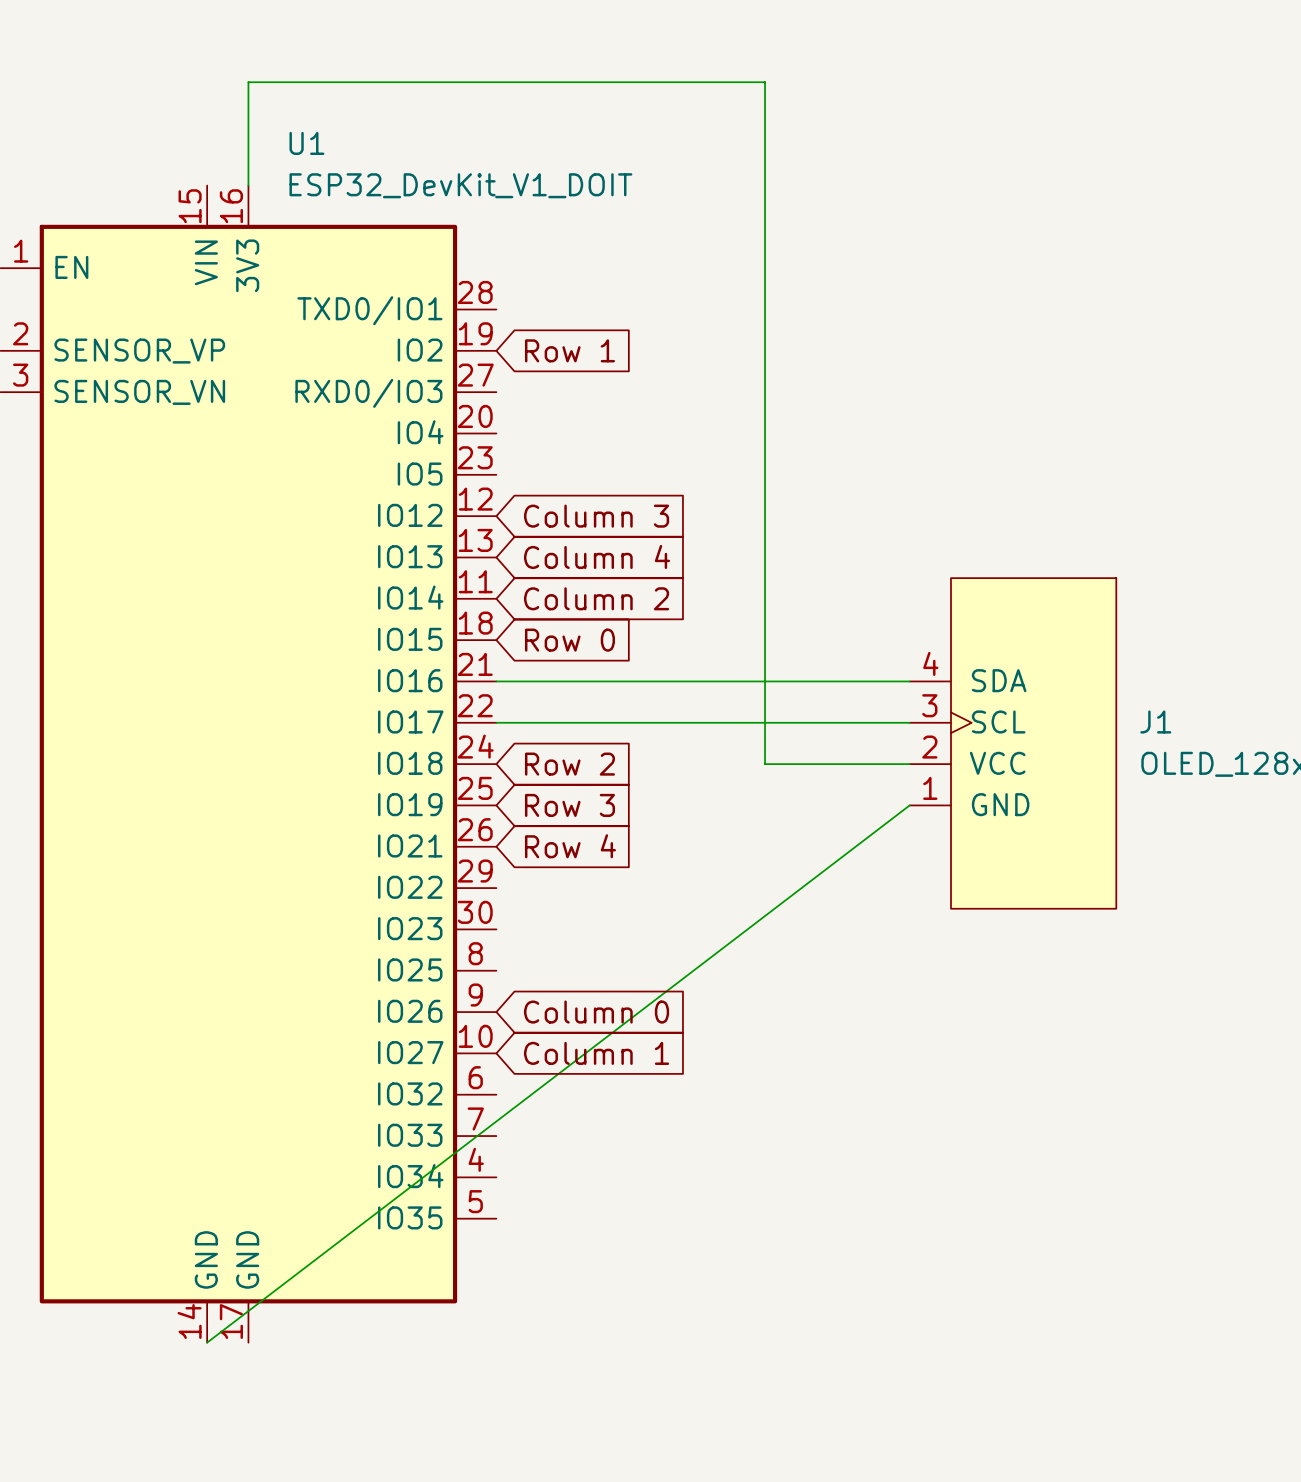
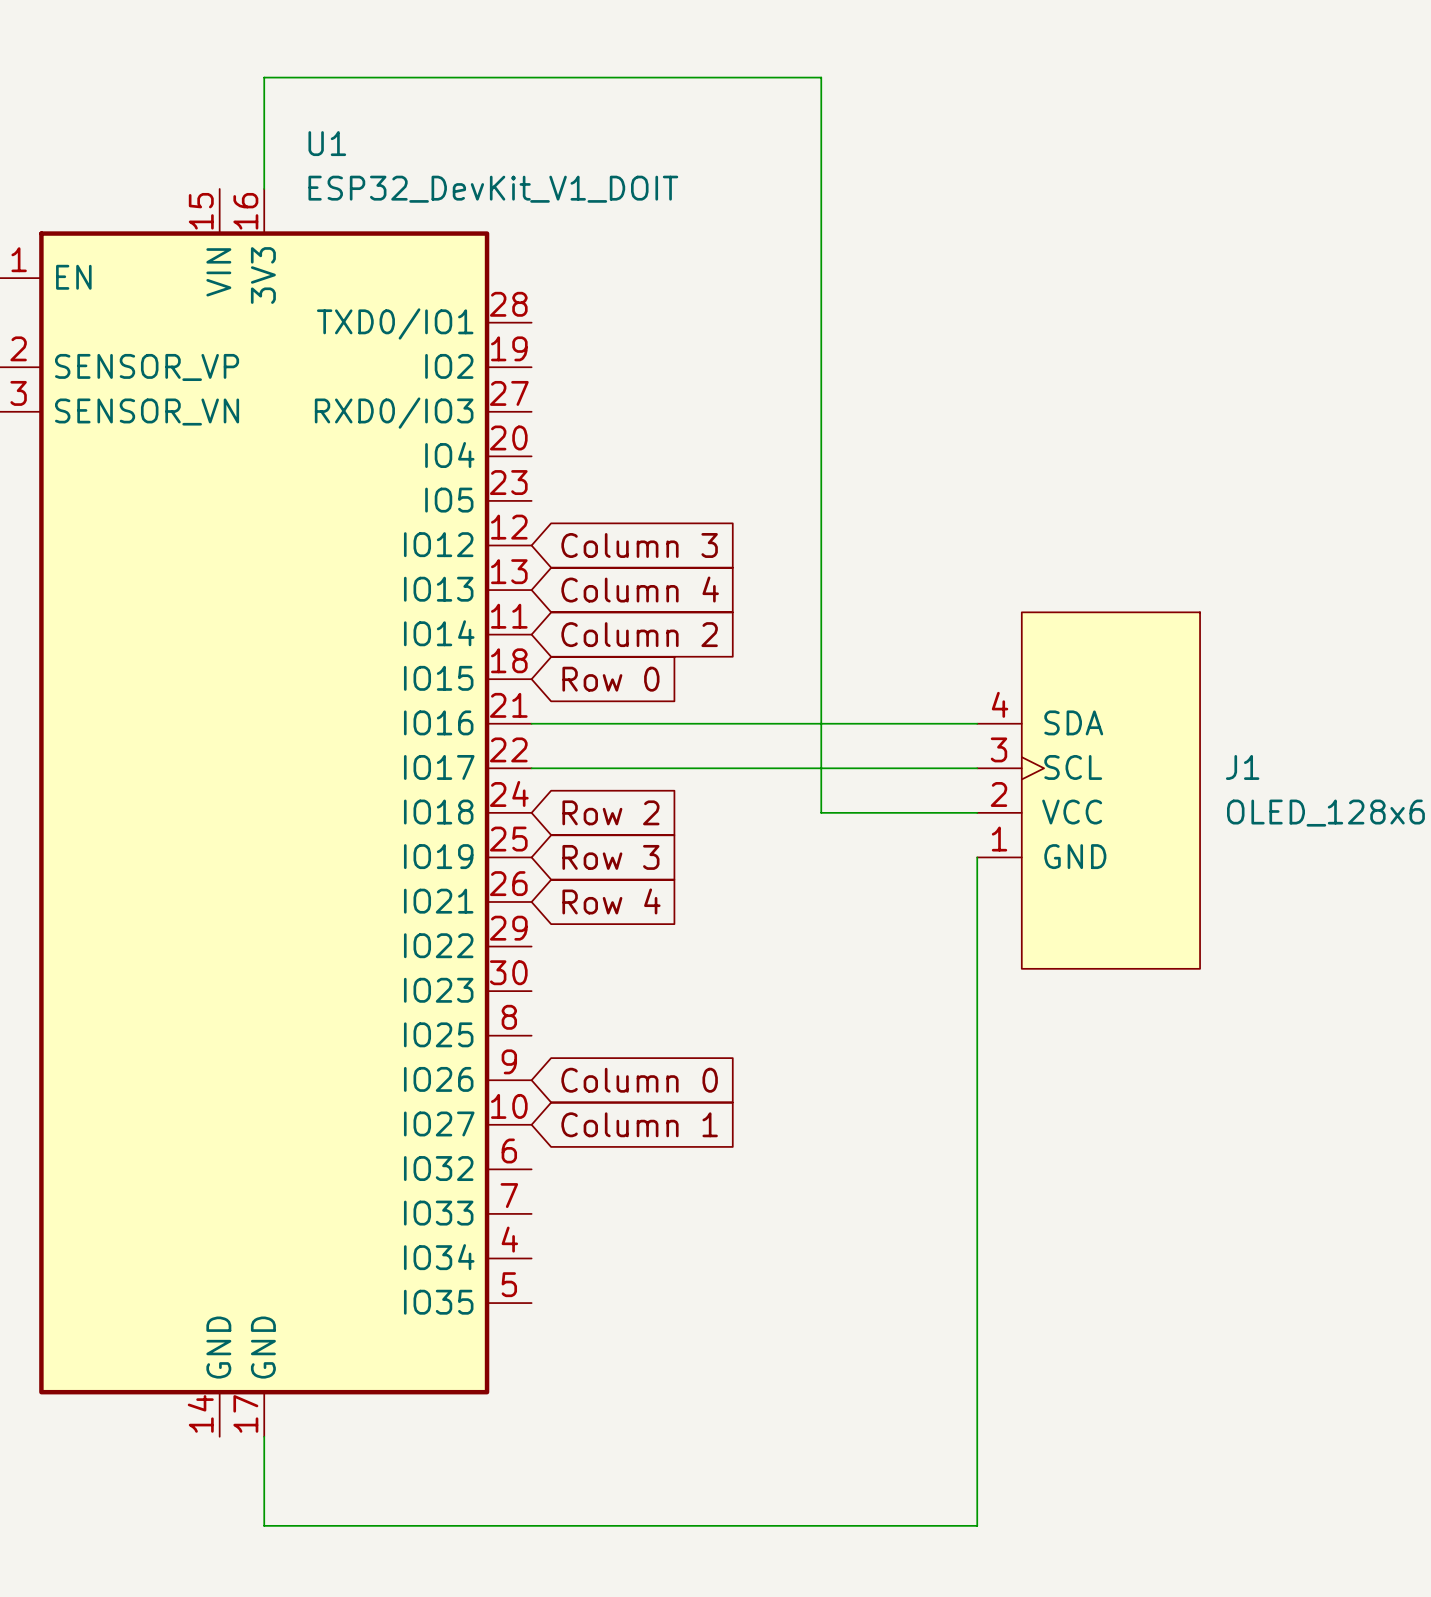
global label: Row 1 (569, 350) -> none
wire: (909, 805) (207, 1342) -> (977, 857) (977, 1525) (264, 1525) (264, 1436)

